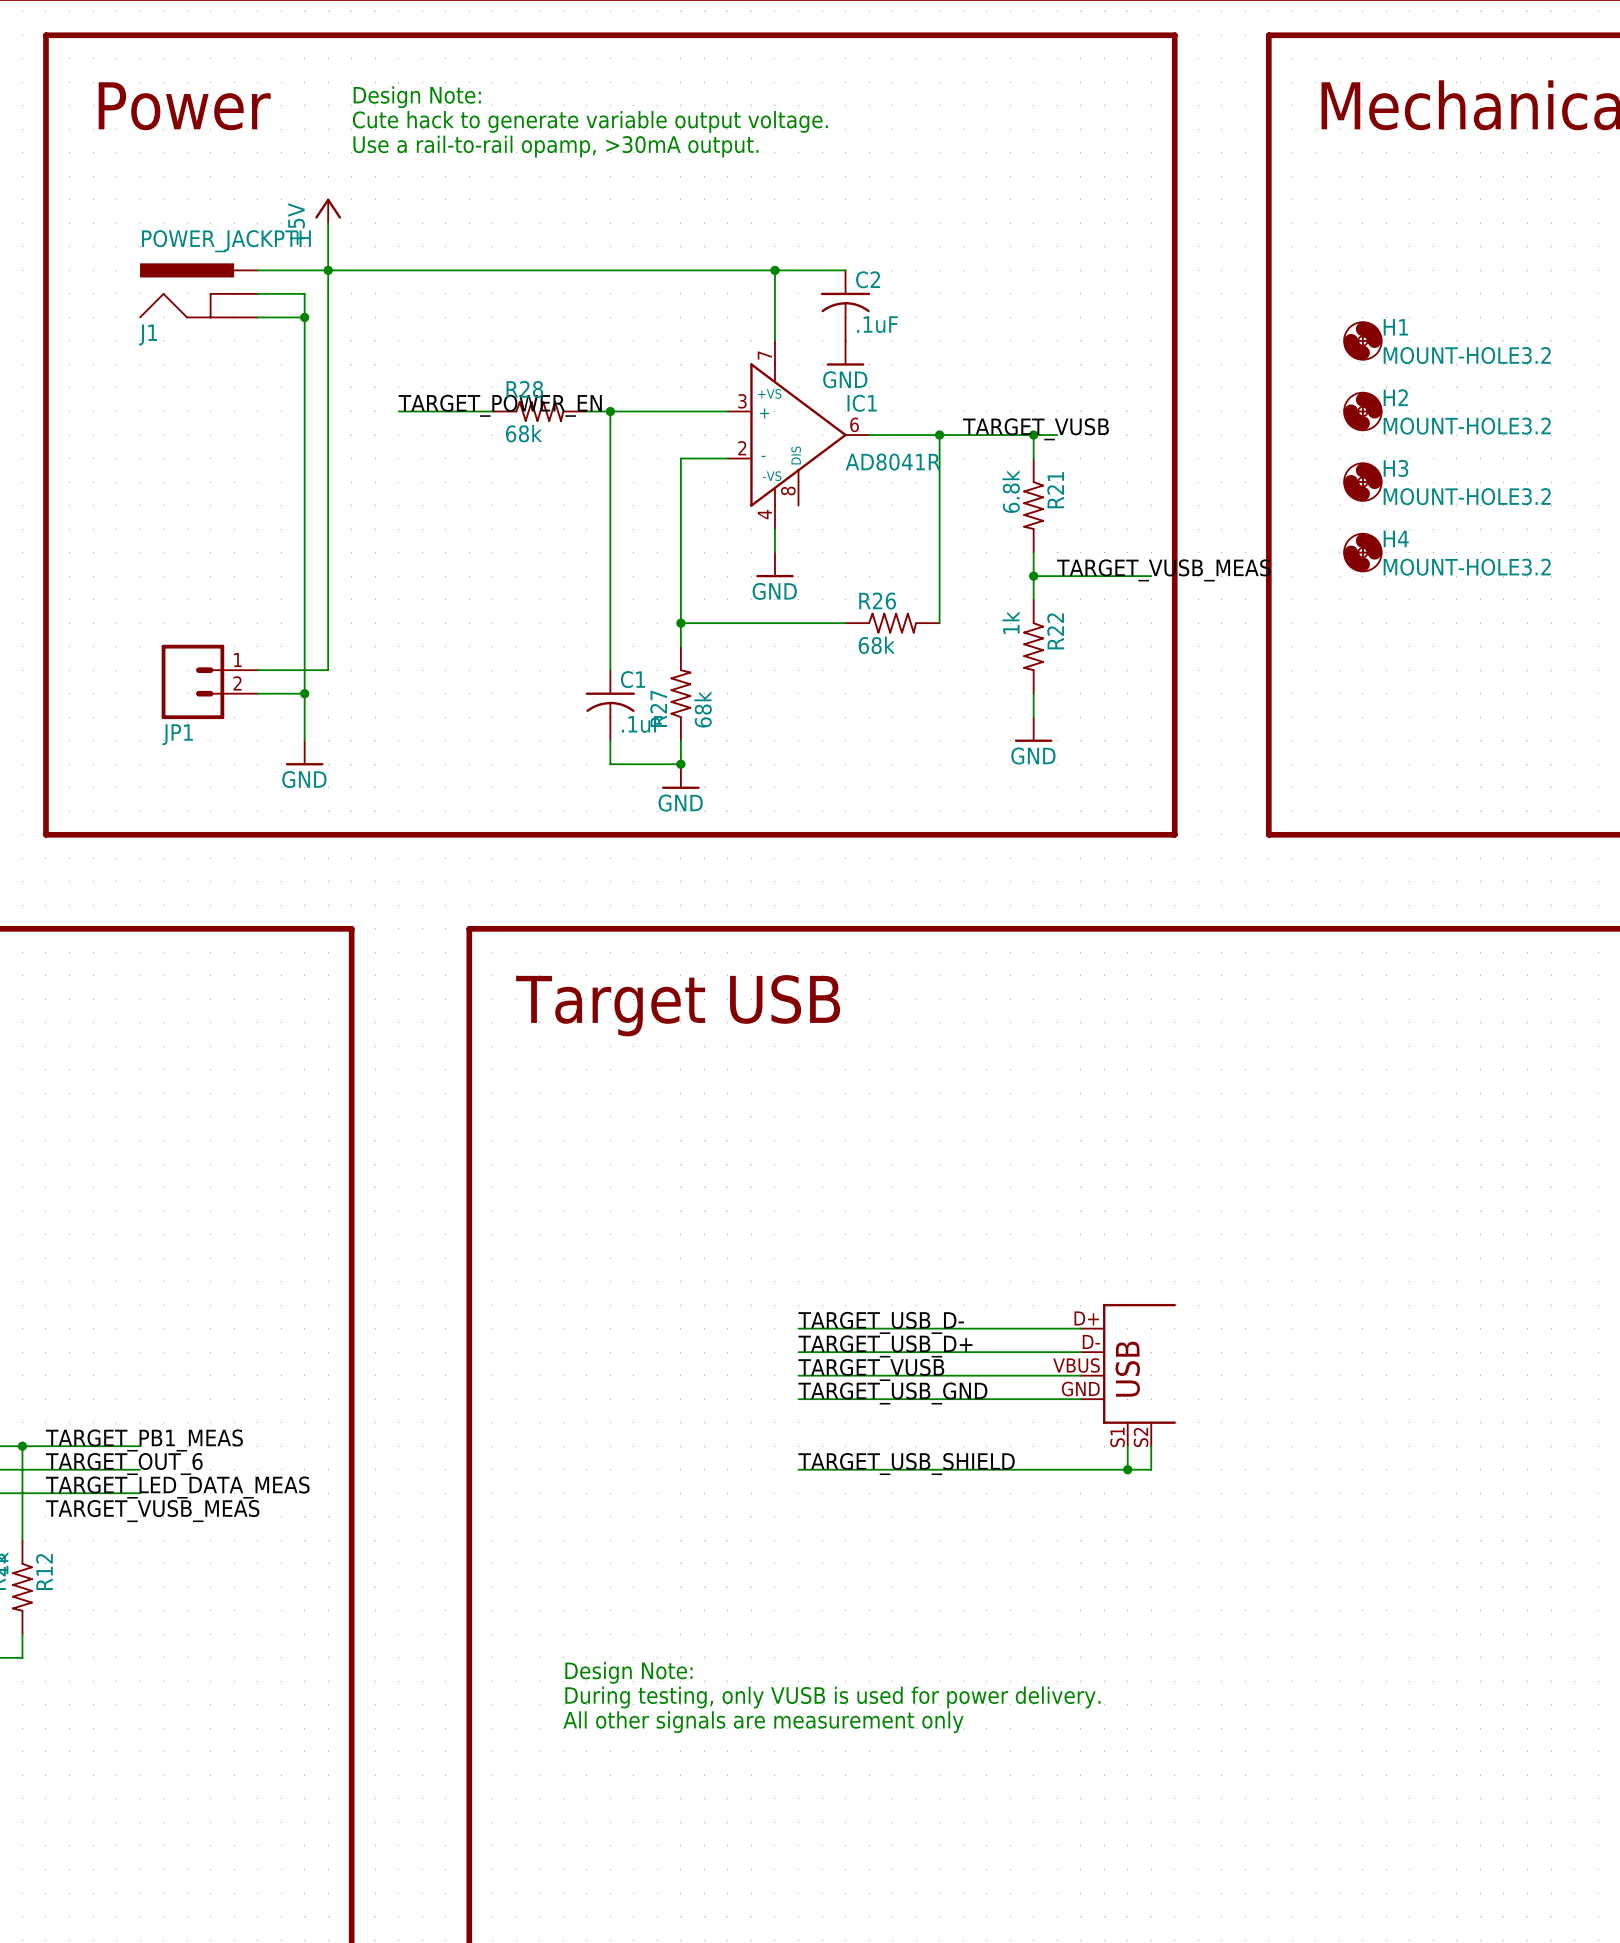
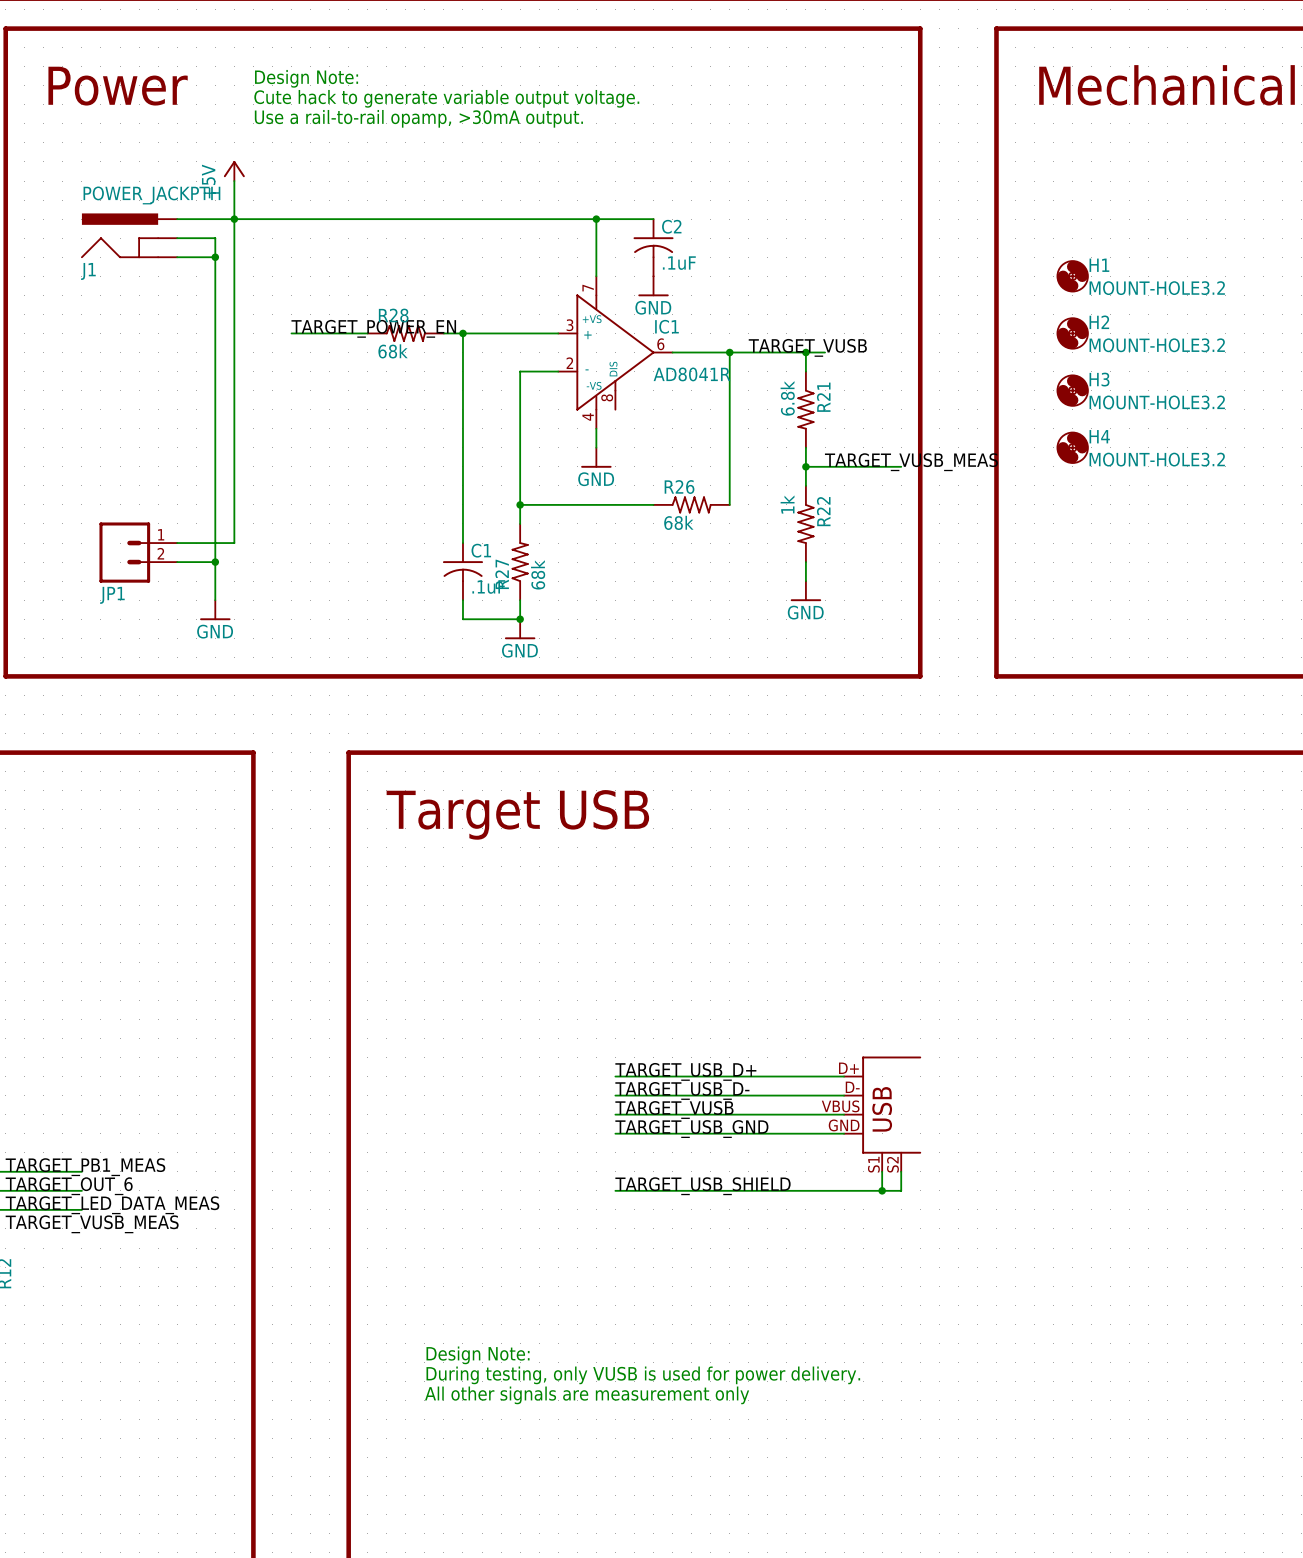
label: TARGET_USB_D- (881, 1322) -> TARGET_USB_D+ (685, 1071)
label: TARGET_USB_D+ (885, 1346) -> TARGET_USB_D- (682, 1090)

